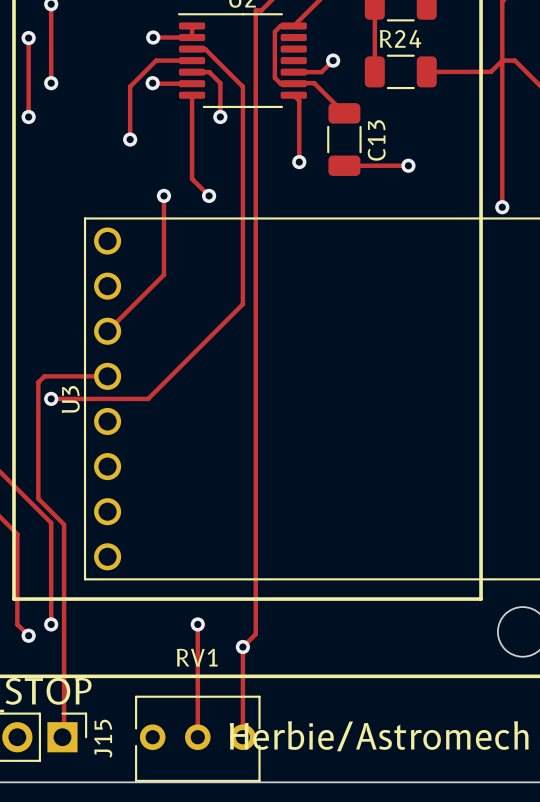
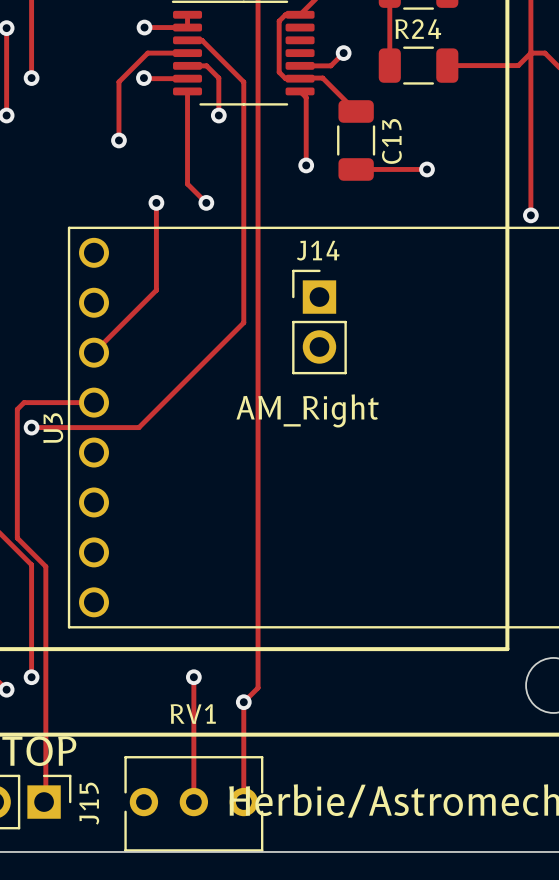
J14: none -> (319, 322)
text: none -> AM_Right (307, 410)

